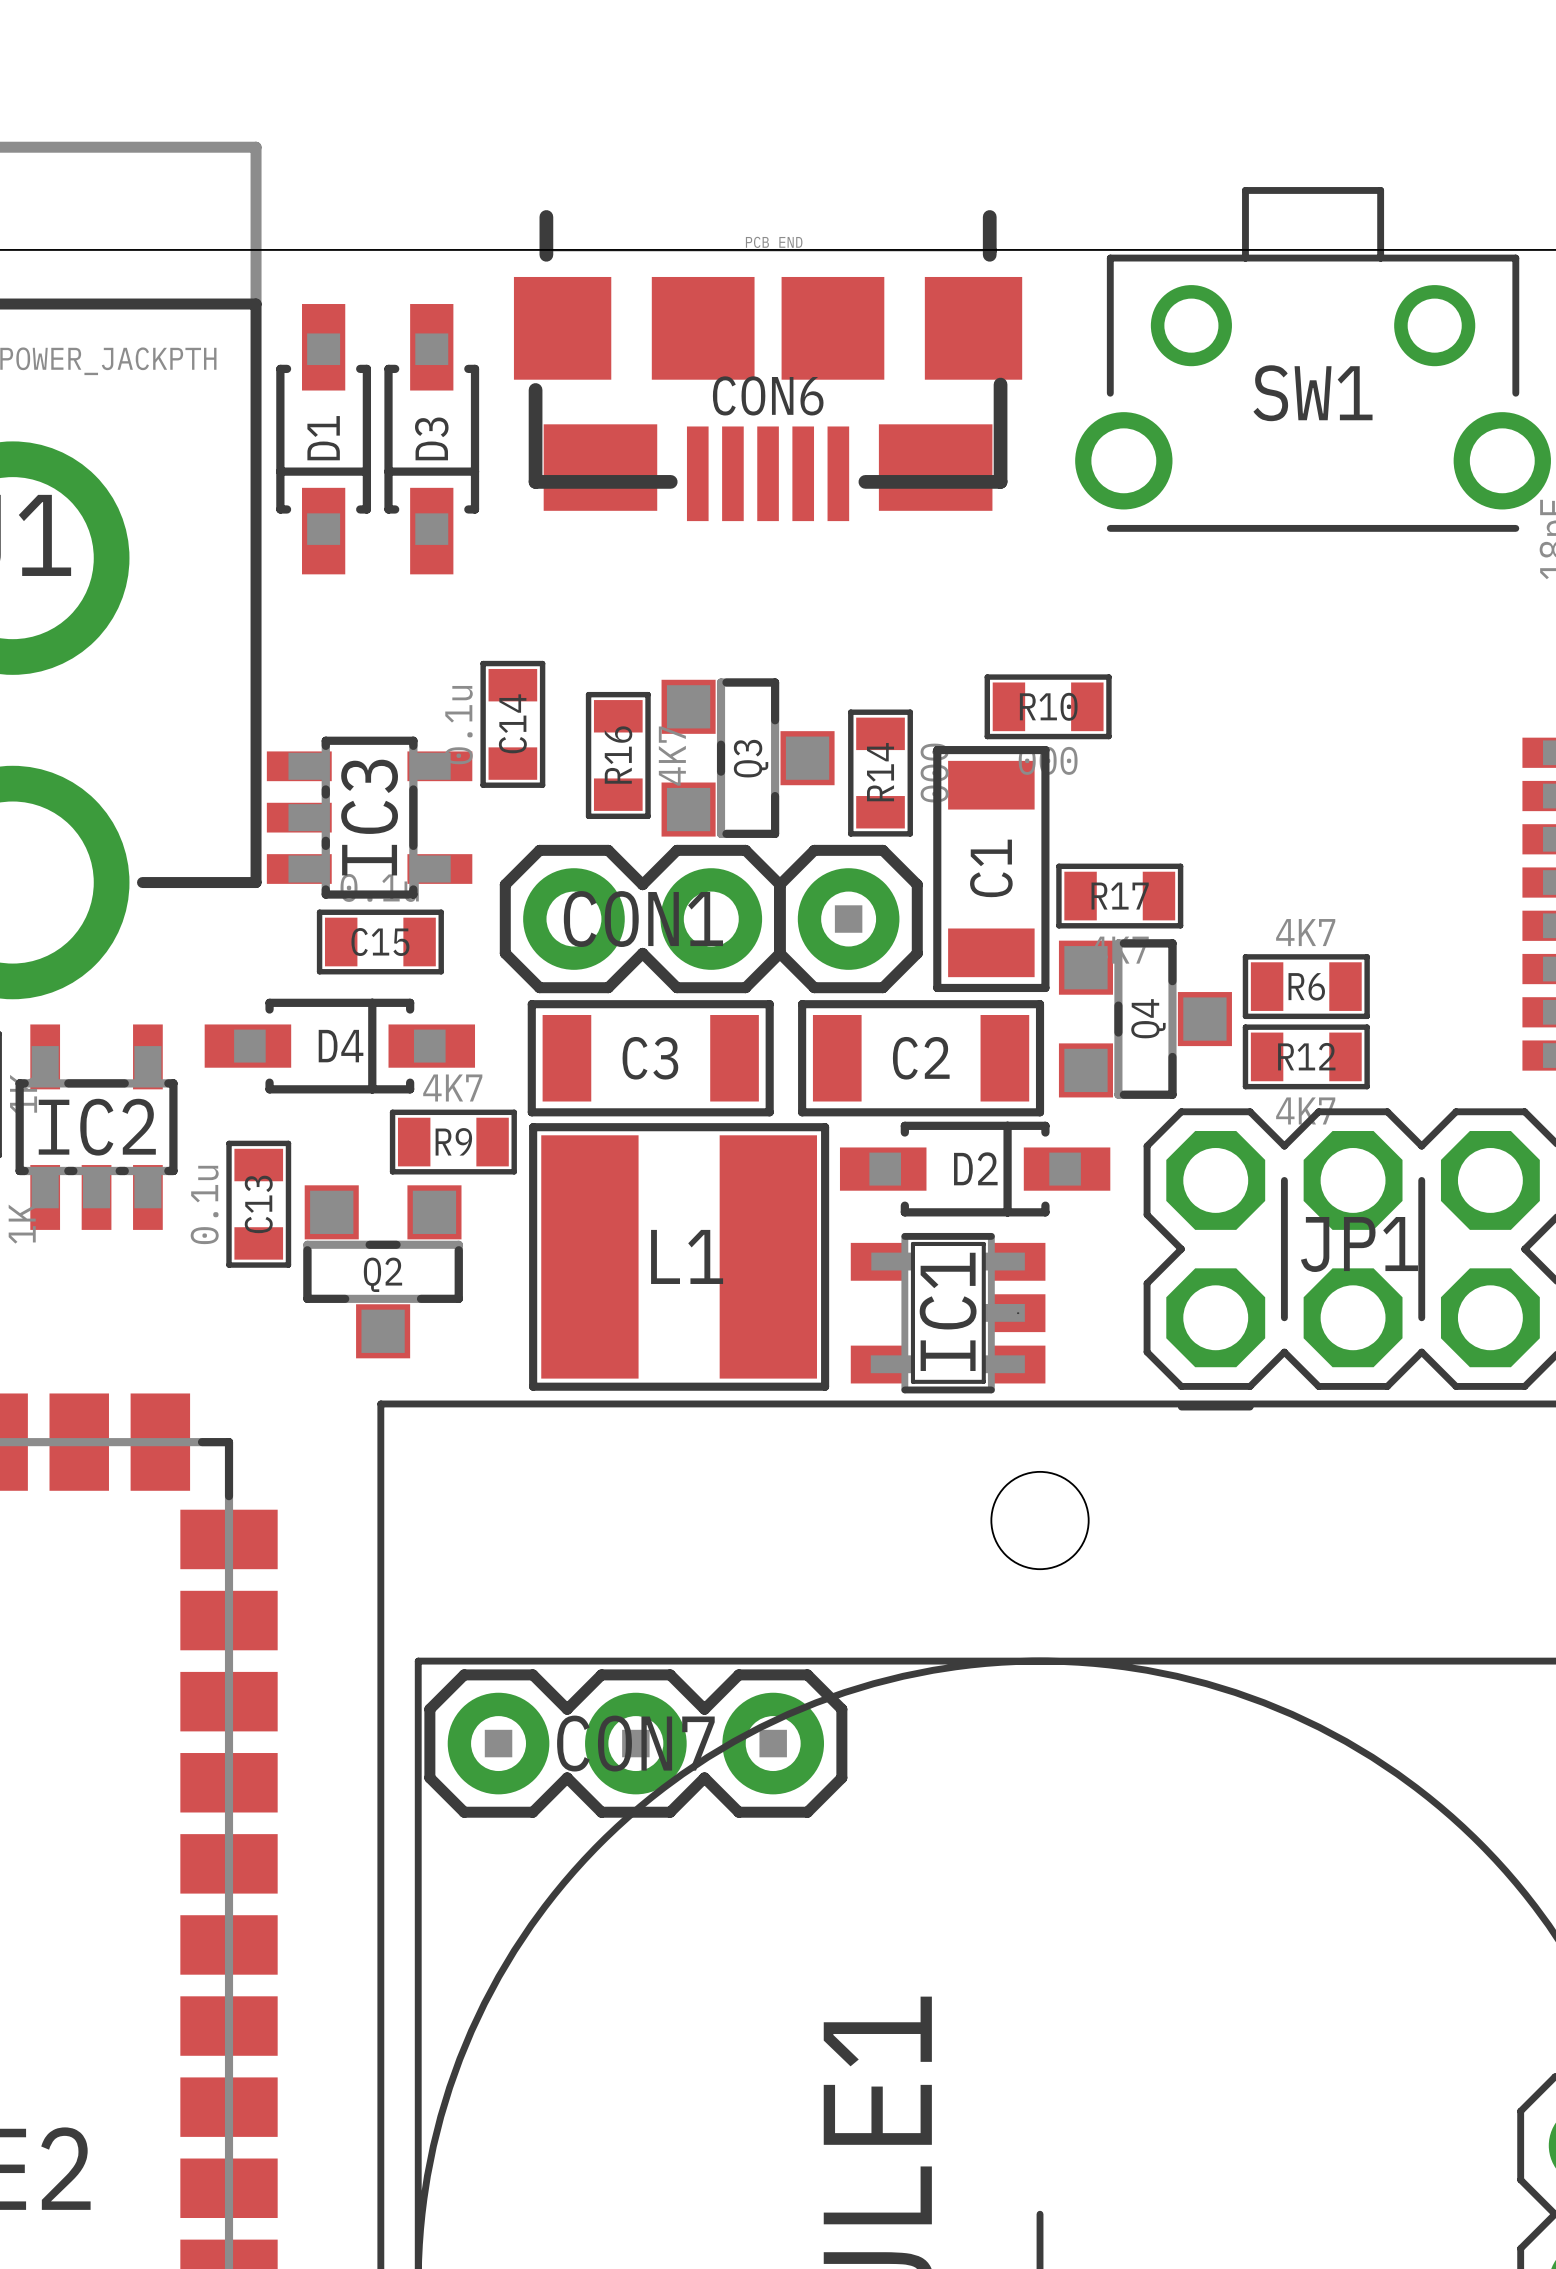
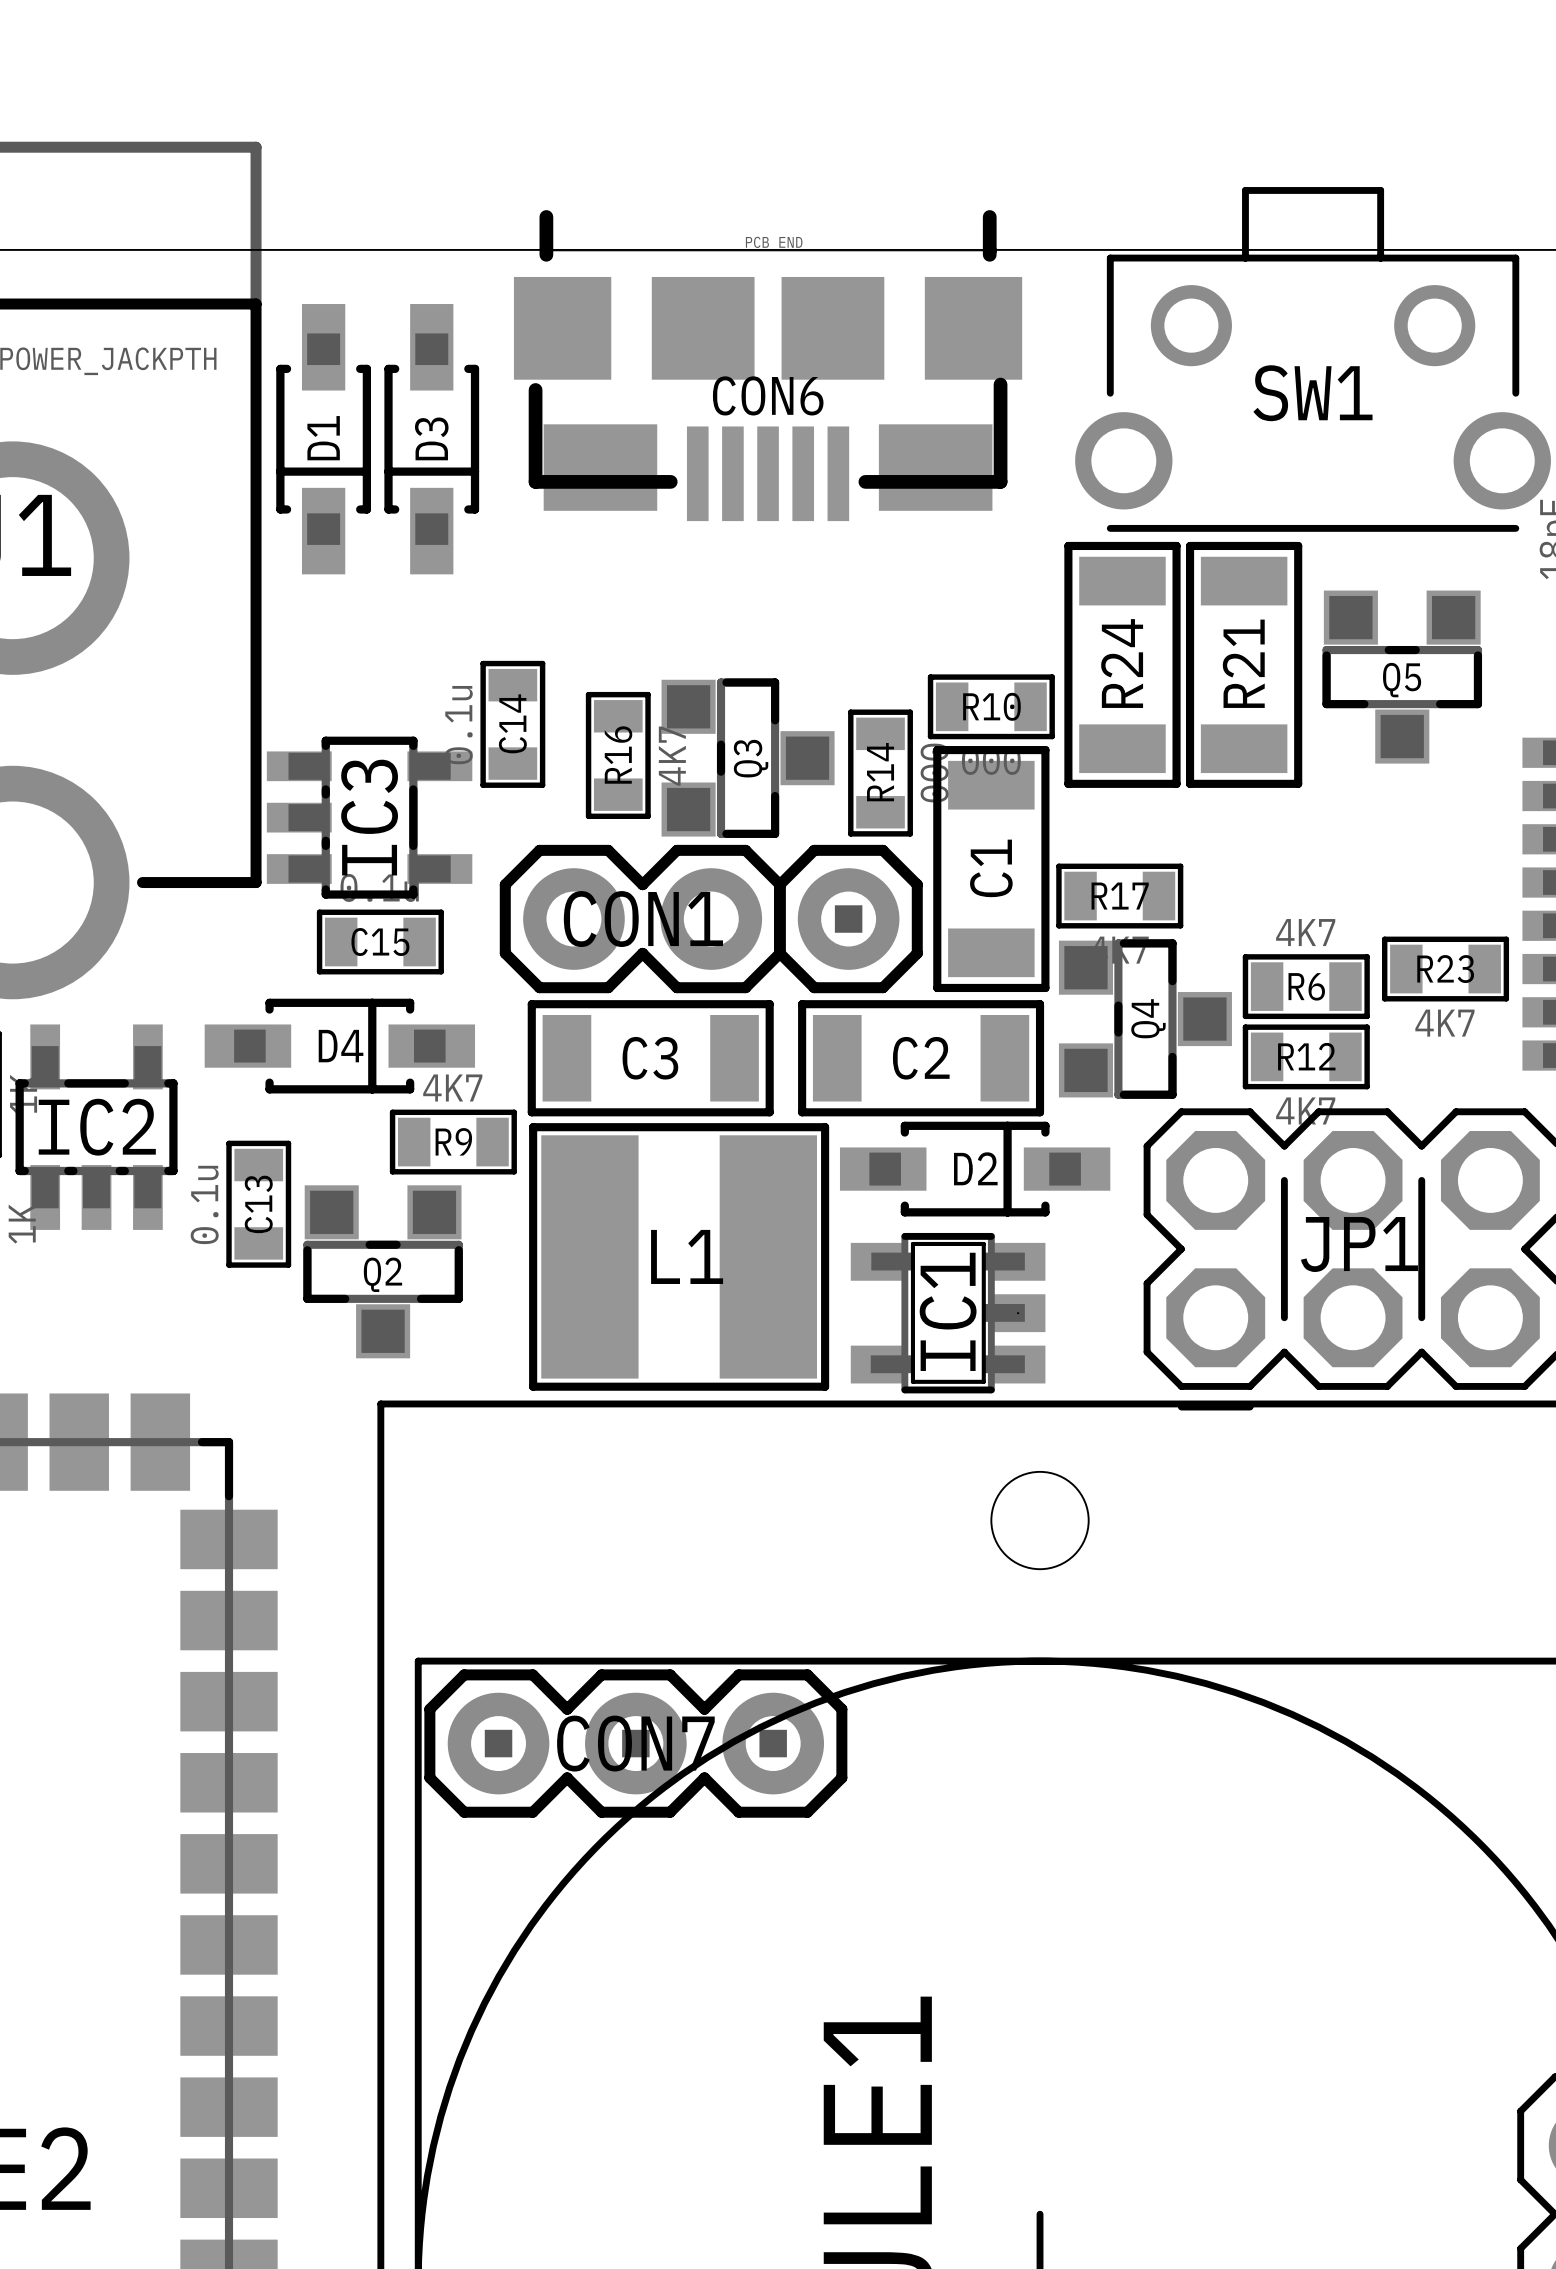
R24: none -> (1122, 664)
R21: none -> (1244, 664)
Q5: none -> (1402, 677)
R10 position: (1048, 706) -> (991, 706)
R23: none -> 4K7 (1445, 969)

